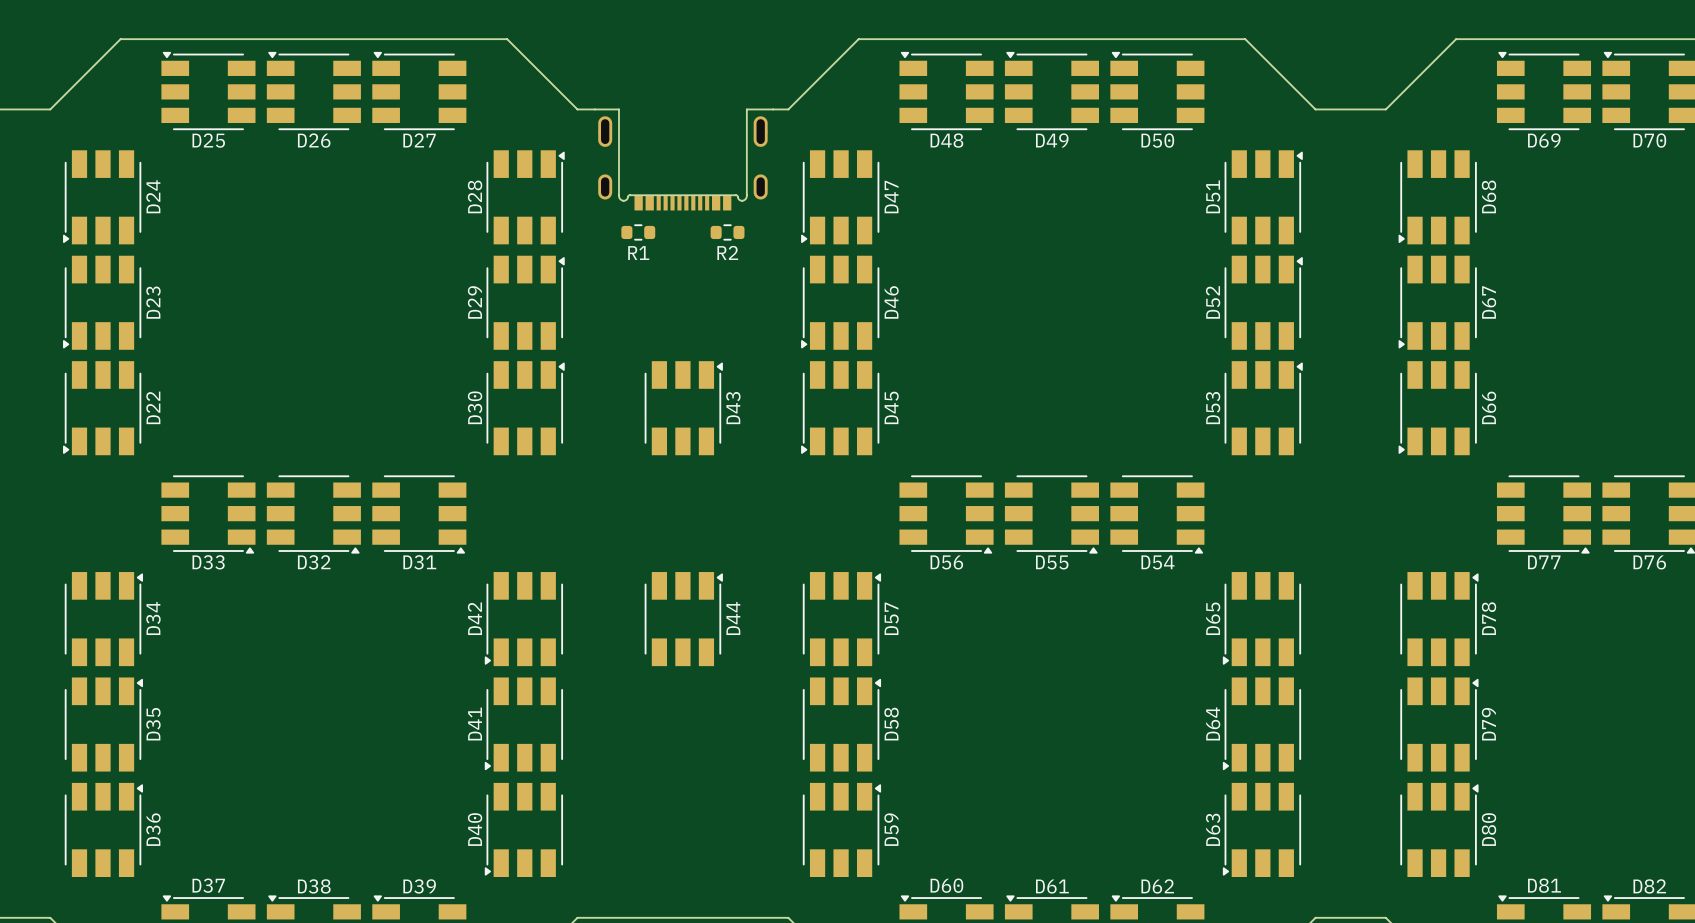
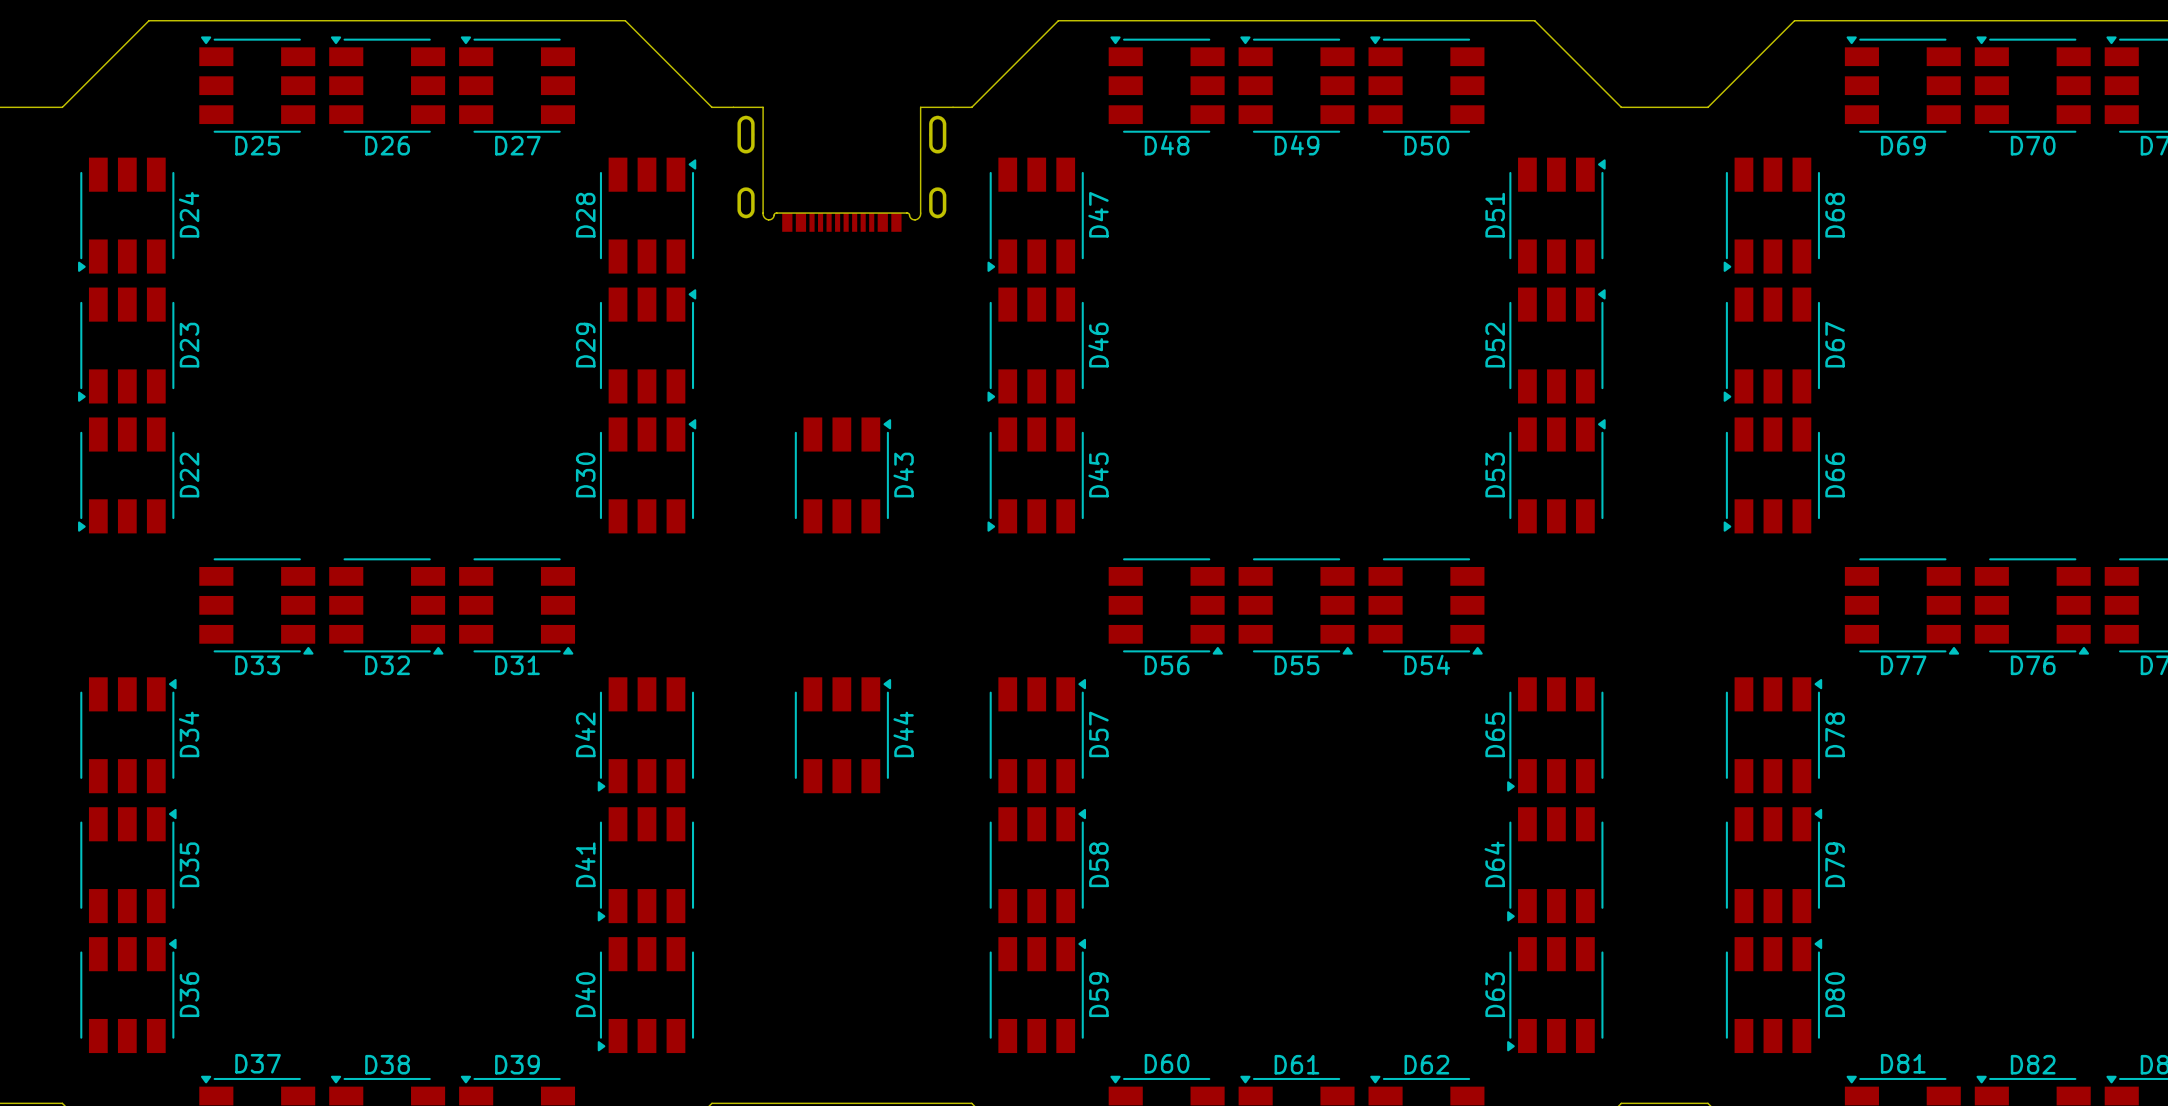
R1: (638, 232) -> none
R2: (727, 232) -> none

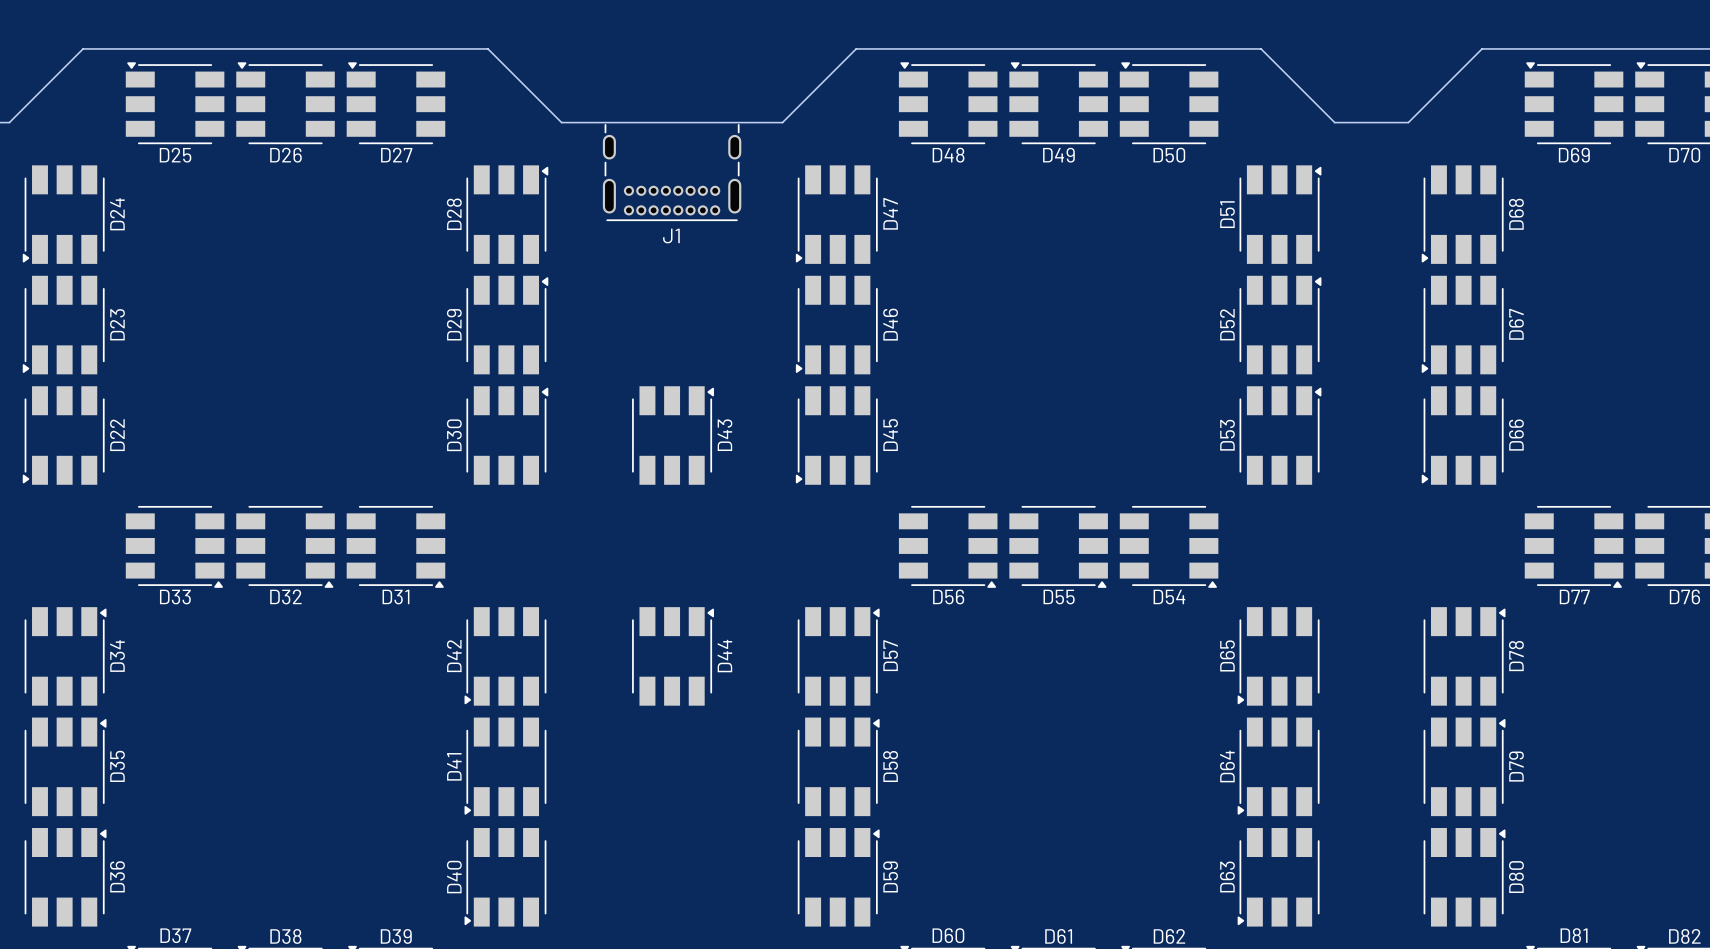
board edge: none -> (579, 122) (766, 122)
J1: none -> (672, 172)
part: (843, 169) -> none

